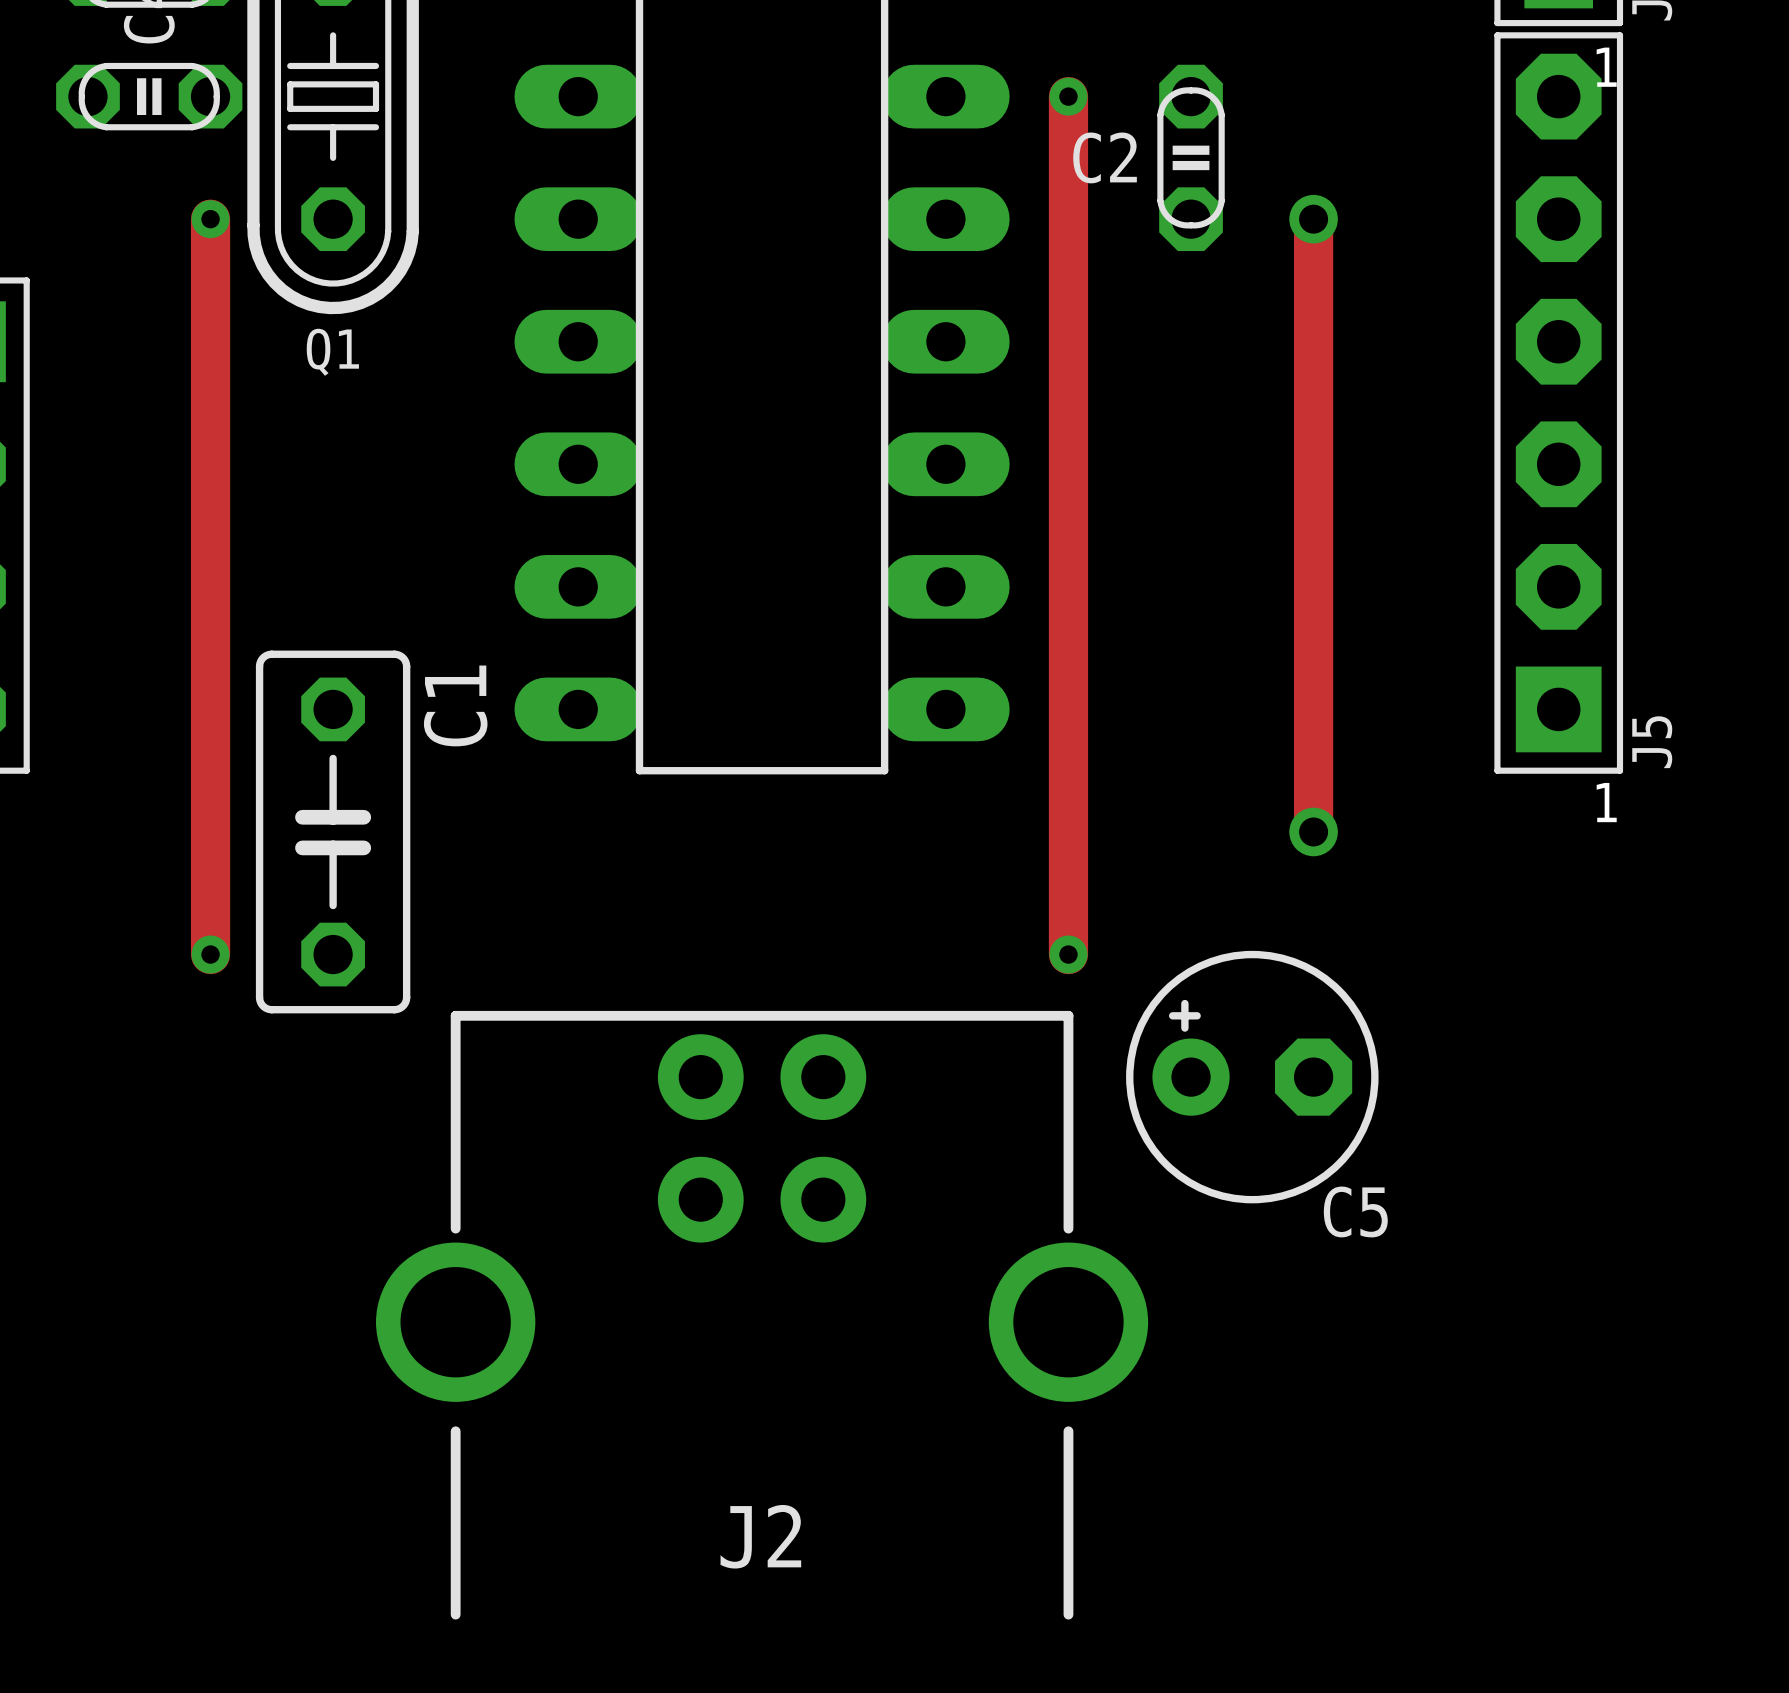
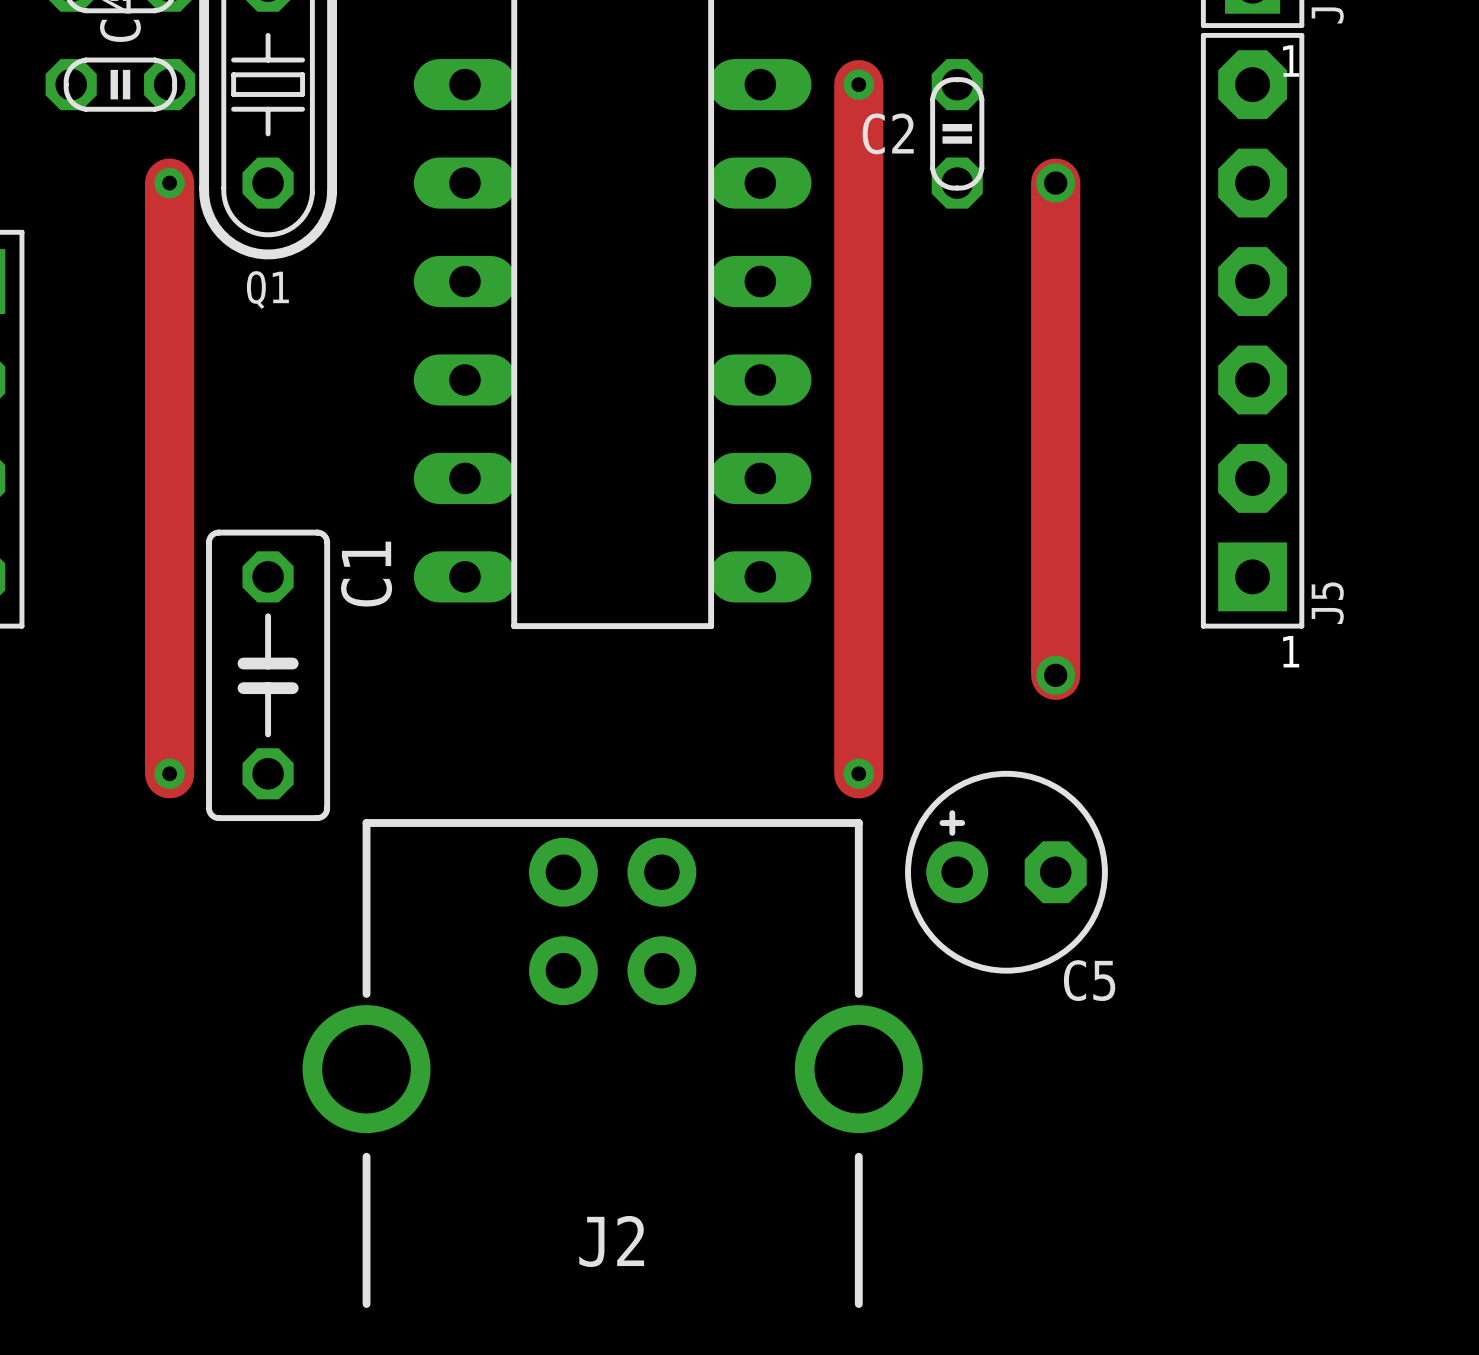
track width: thin (1068, 96) (1068, 954) -> thick (858, 84) (858, 773)
track width: thin (210, 219) (210, 954) -> thick (169, 183) (169, 773)
track width: thin (1313, 219) (1313, 831) -> thick (1055, 183) (1055, 675)

